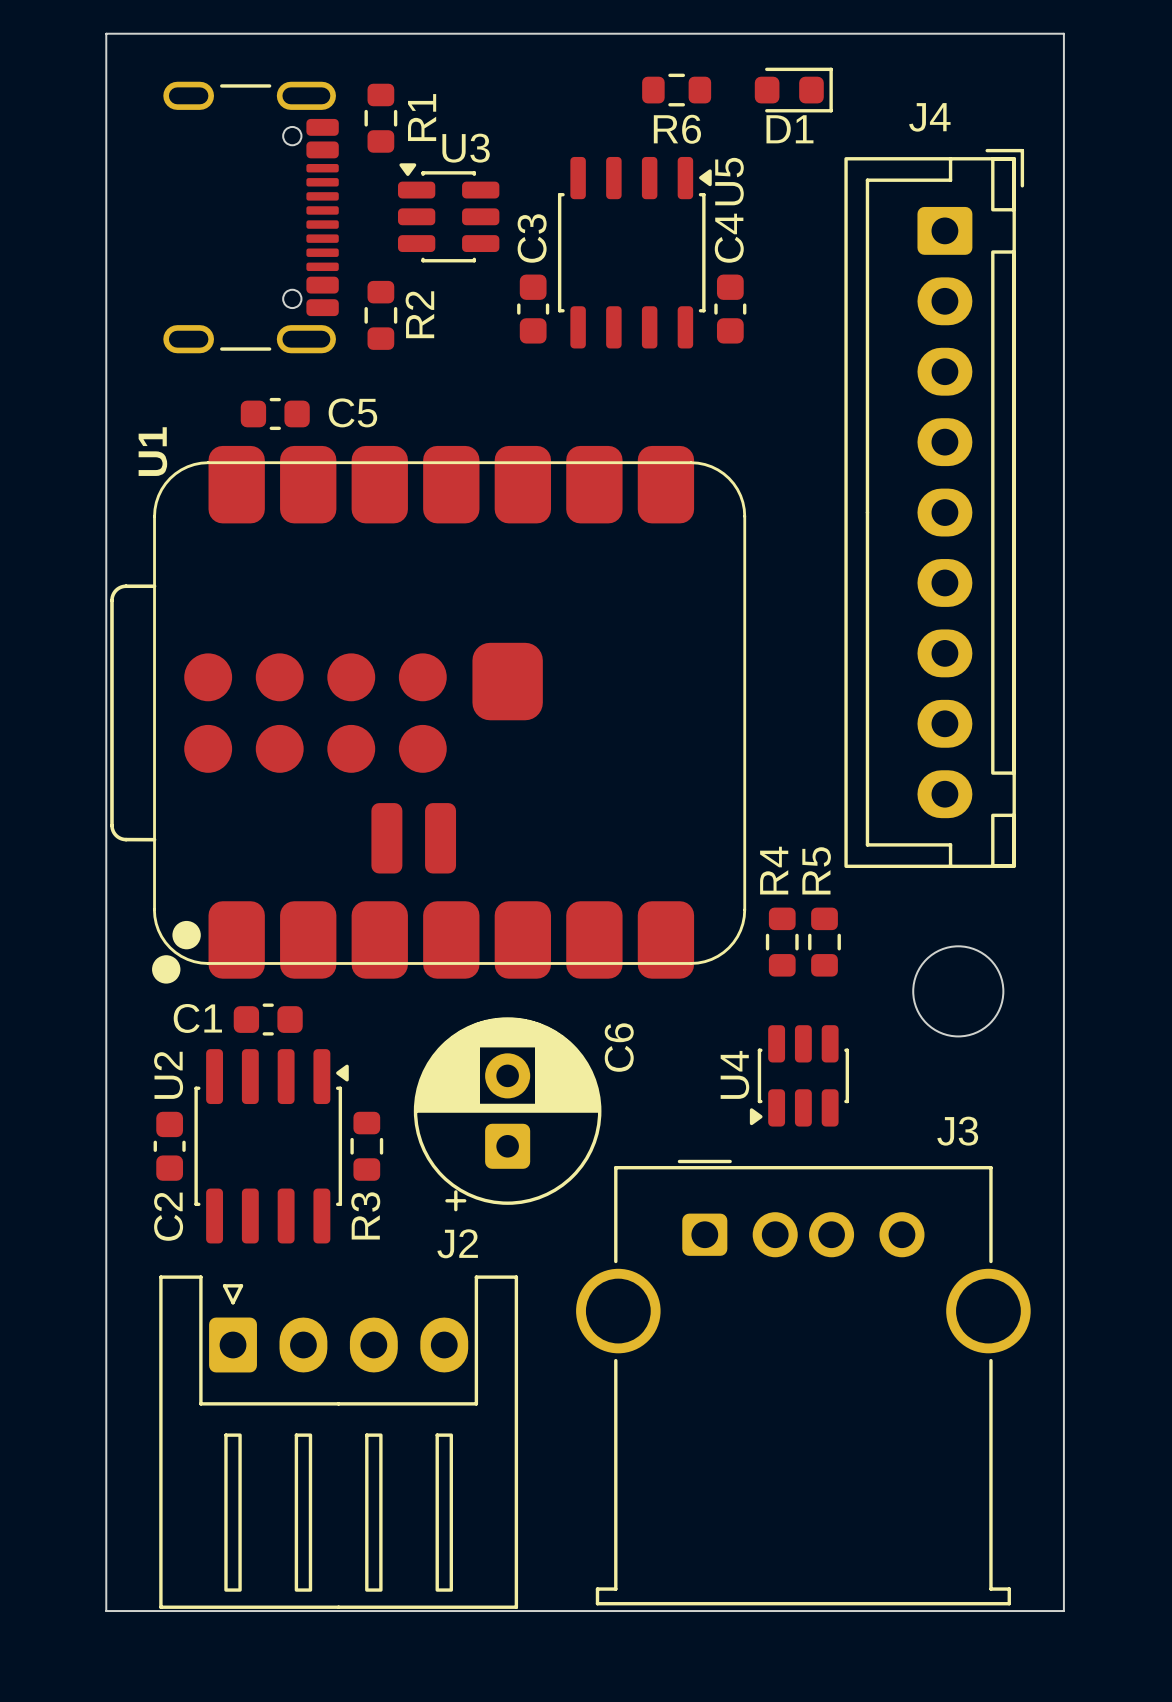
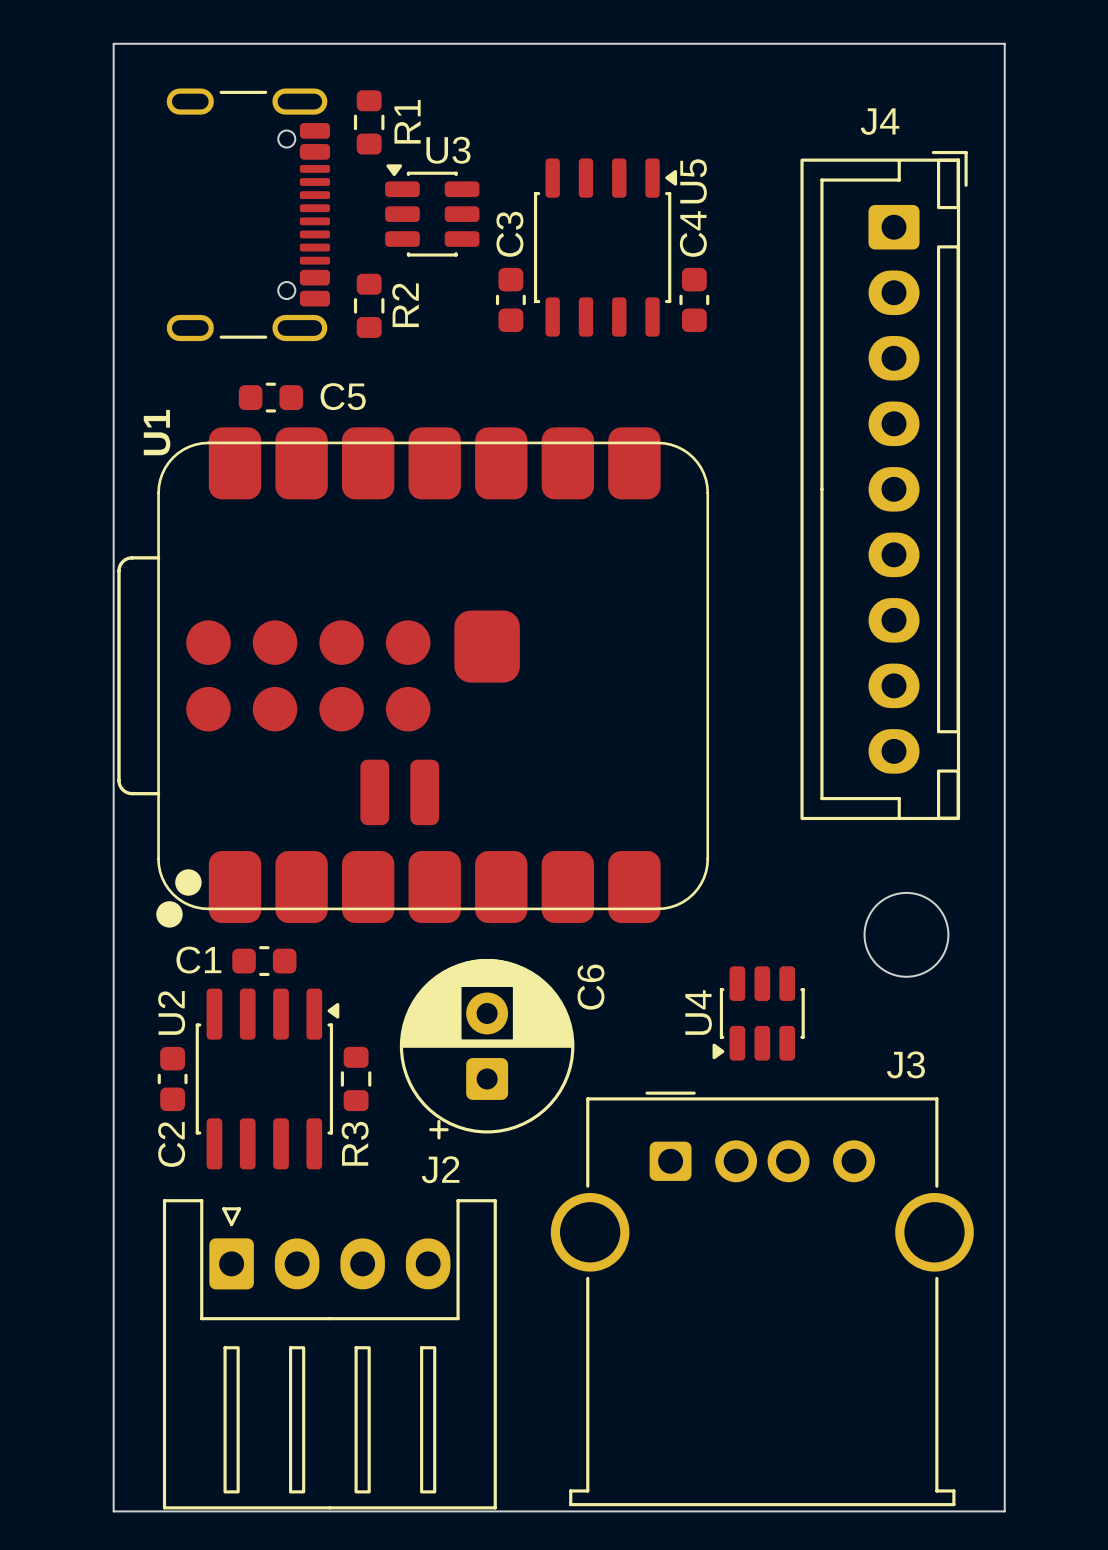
R6: (676, 90) -> none
D1: (793, 90) -> none
R4: (782, 942) -> none
R5: (824, 942) -> none

